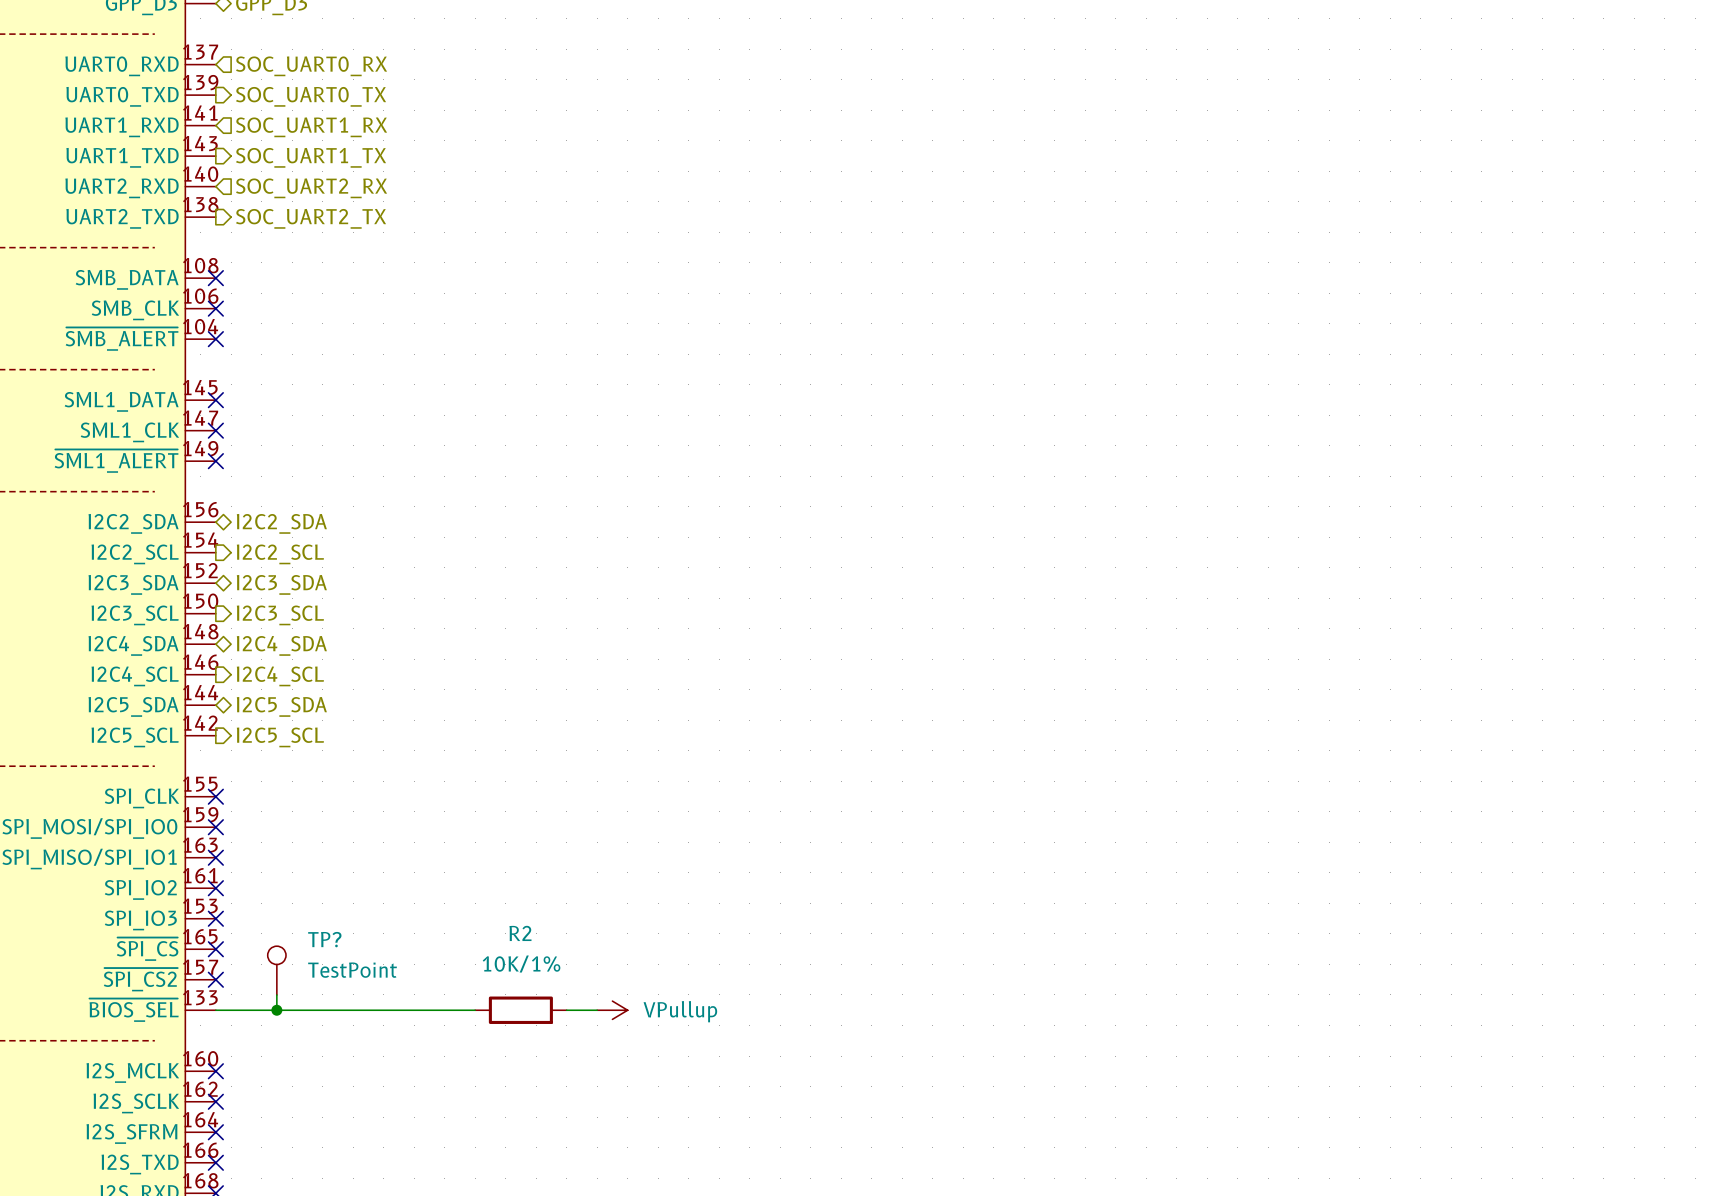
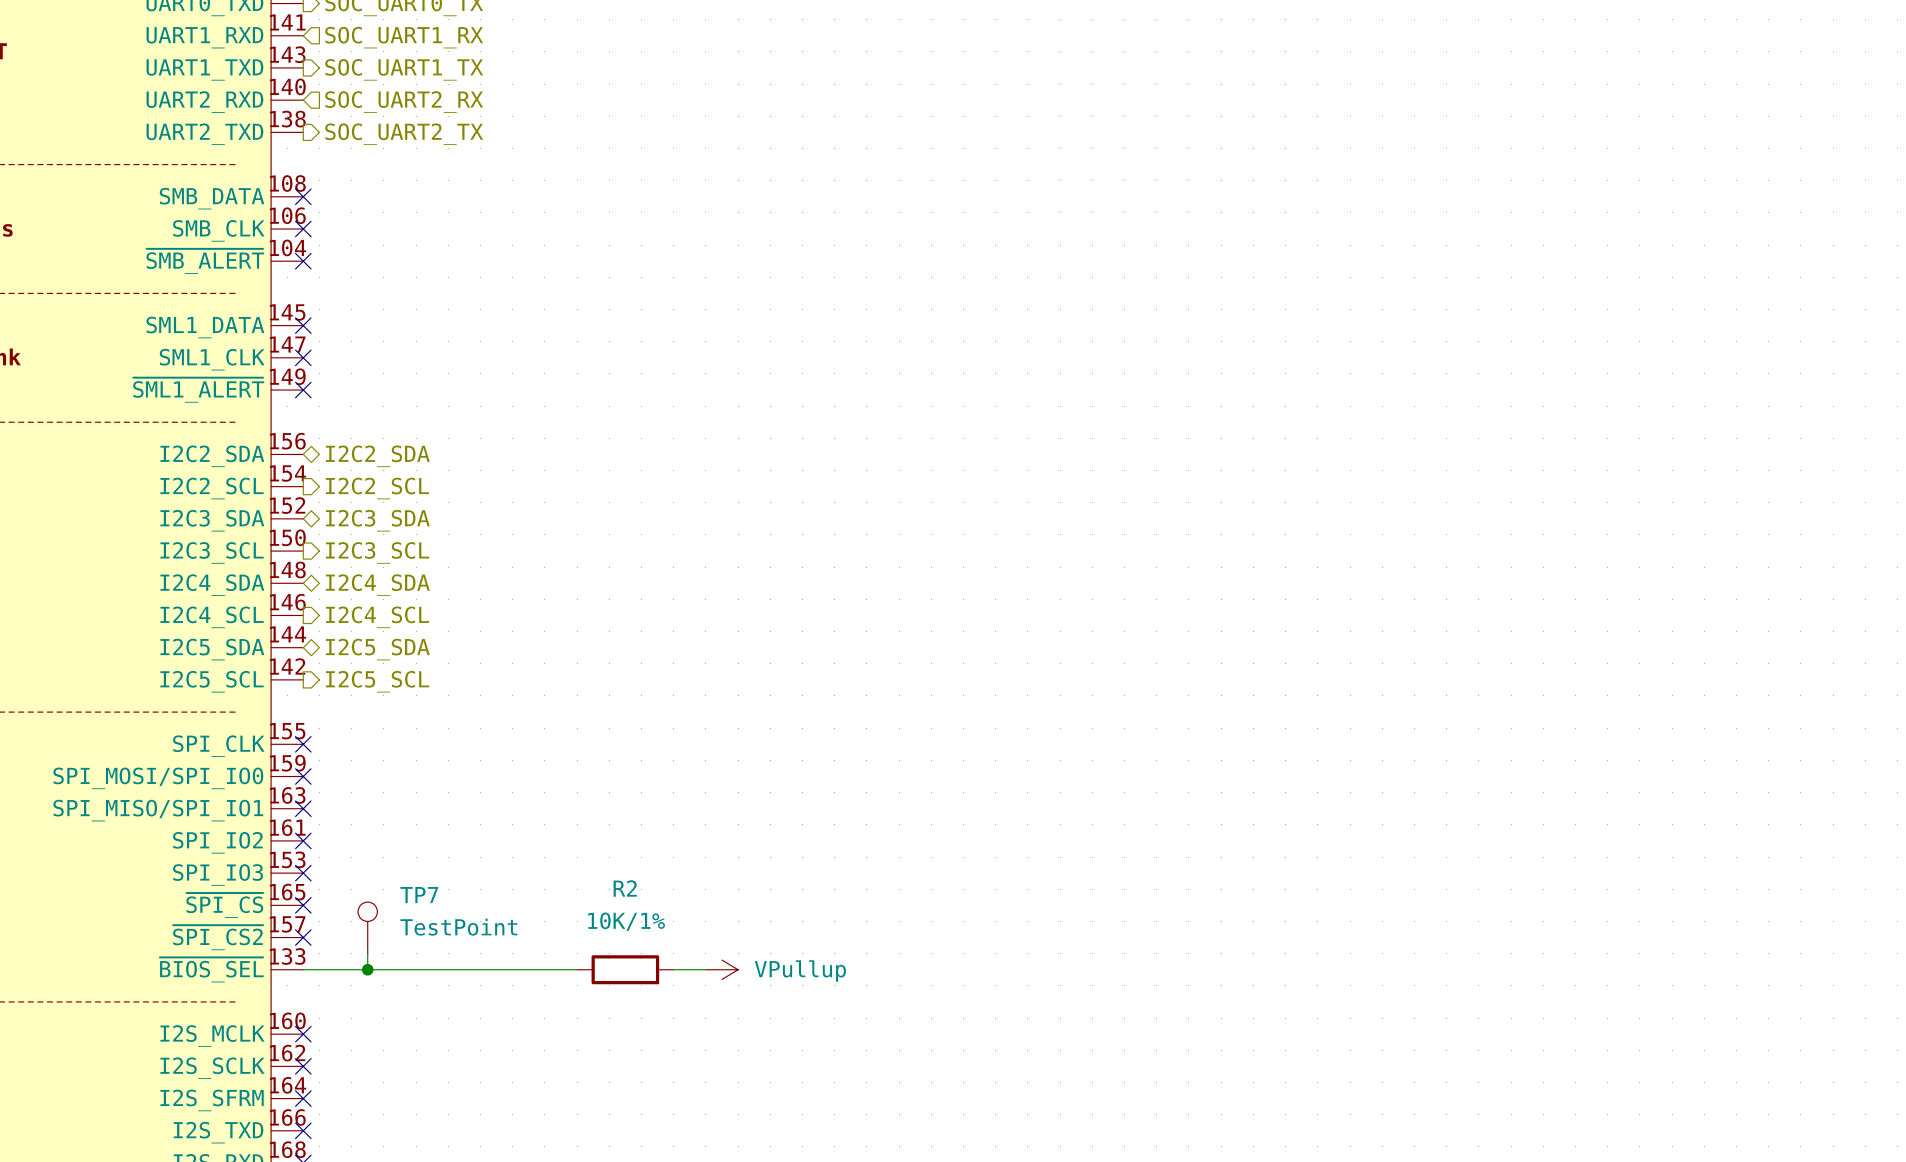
TP? name: TP? (324, 939) -> TP7 (419, 895)

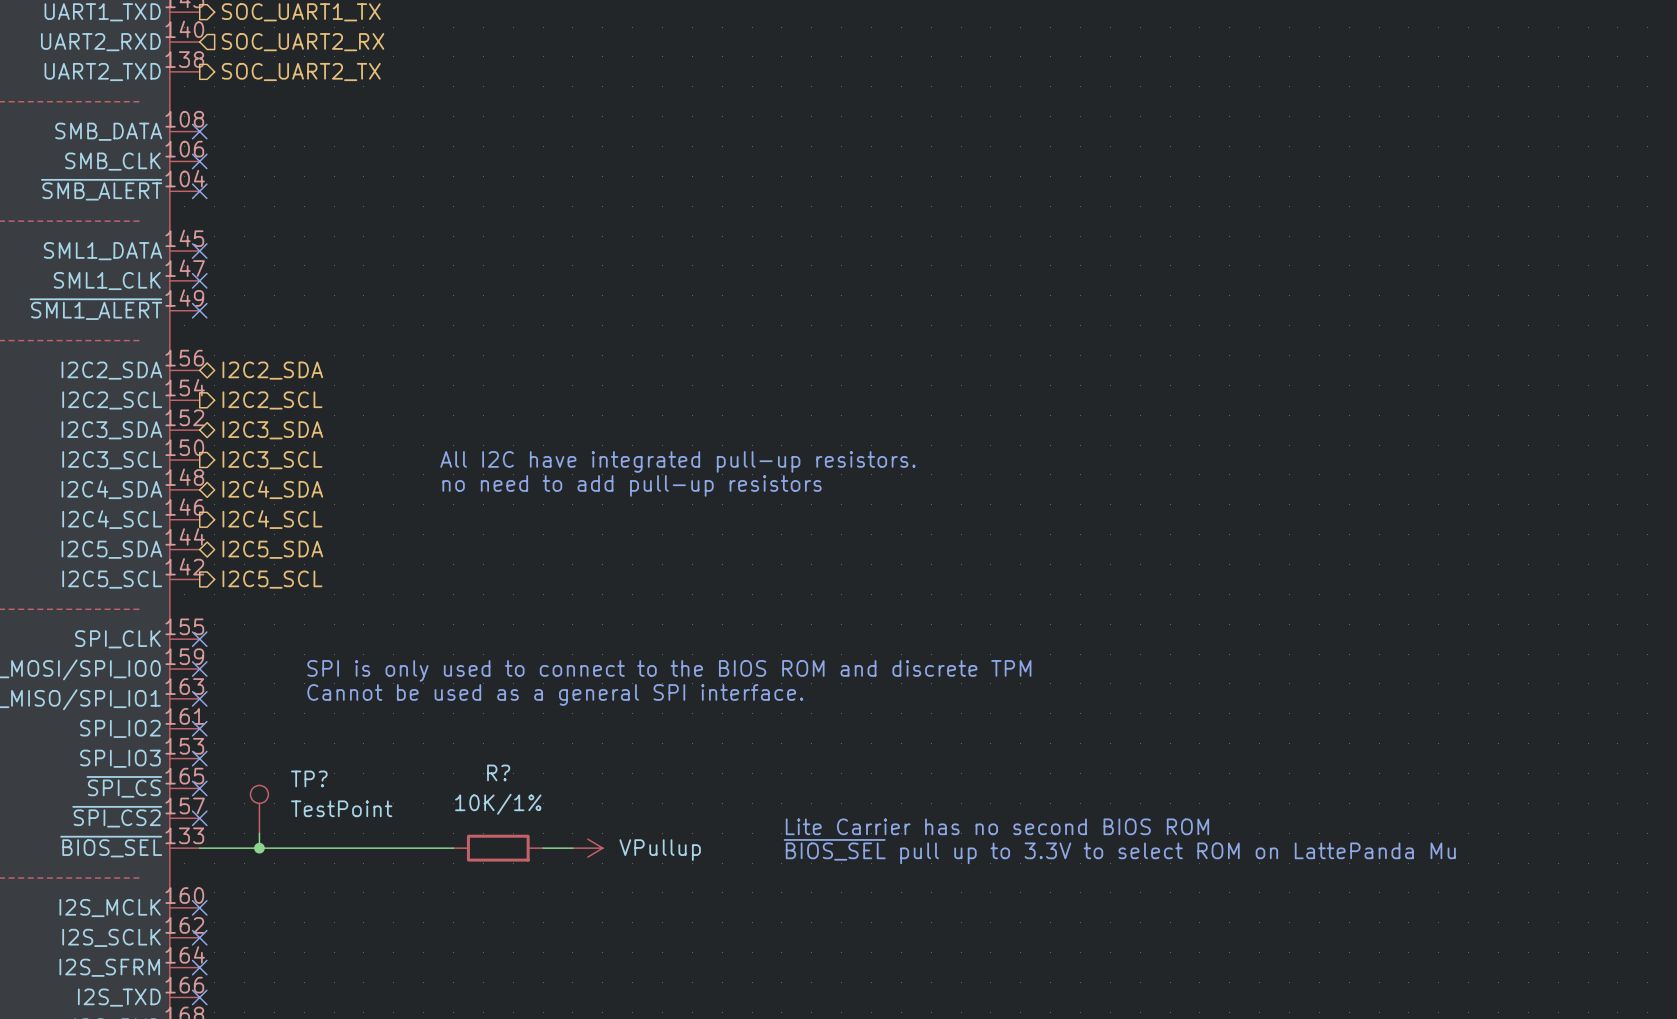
text: none -> All I2C have integrated pull-up resistors. (677, 461)
text: none -> no need to add pull-up resistors (632, 485)
text: none -> SPI is only used to connect to the BIOS ROM and discrete TPM (669, 670)
text: none -> Cannot be used as a general SPI interface. (555, 694)
R2 name: R2 (625, 888) -> R? (498, 772)
TP7 name: TP7 (419, 895) -> TP? (309, 778)
text: none -> Lite Carrier has no second BIOS ROM (997, 826)
text: none -> ~{BIOS_SEL} pull up to 3.3V to select ROM on LattePanda Mu (1119, 851)

